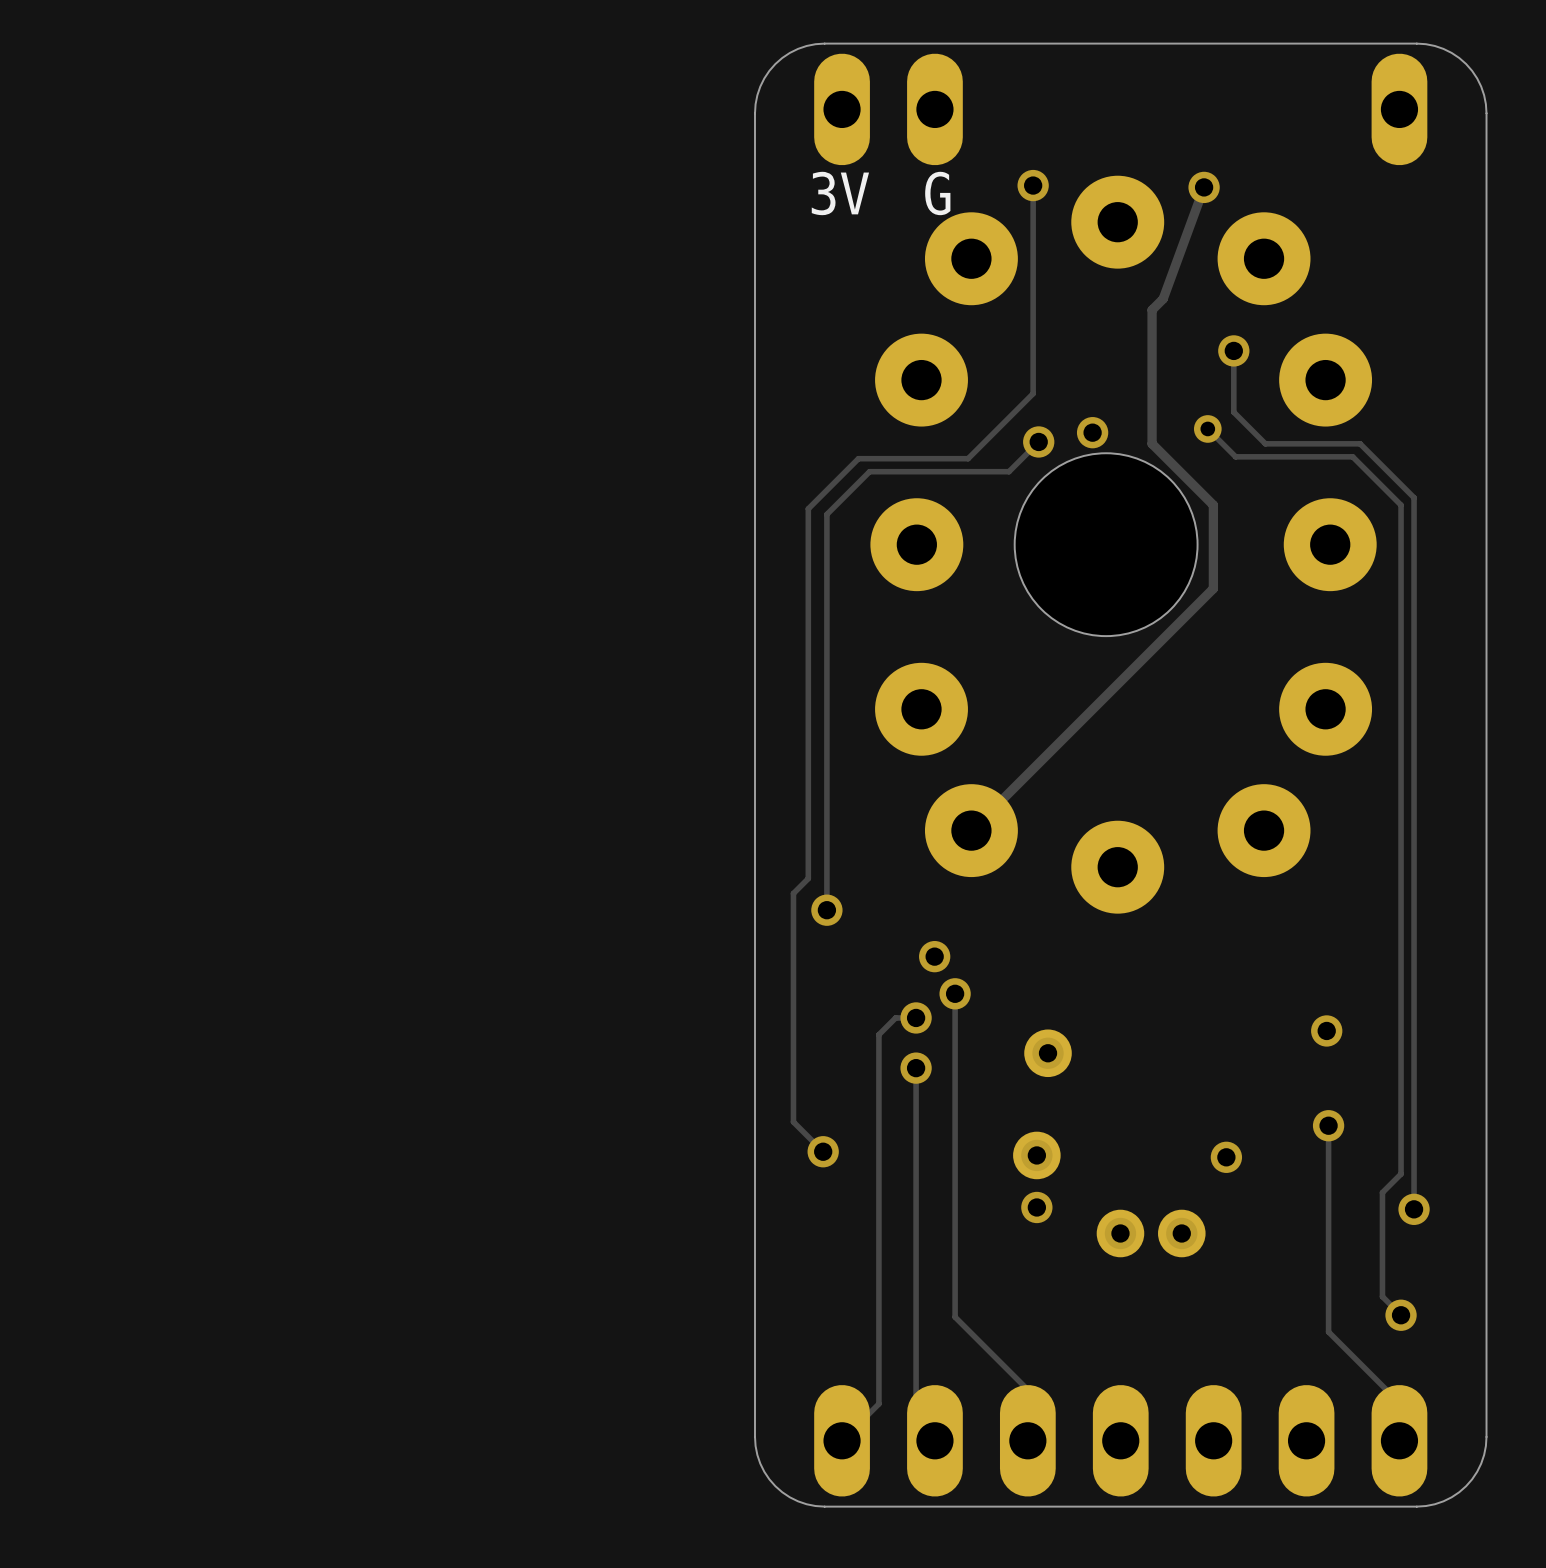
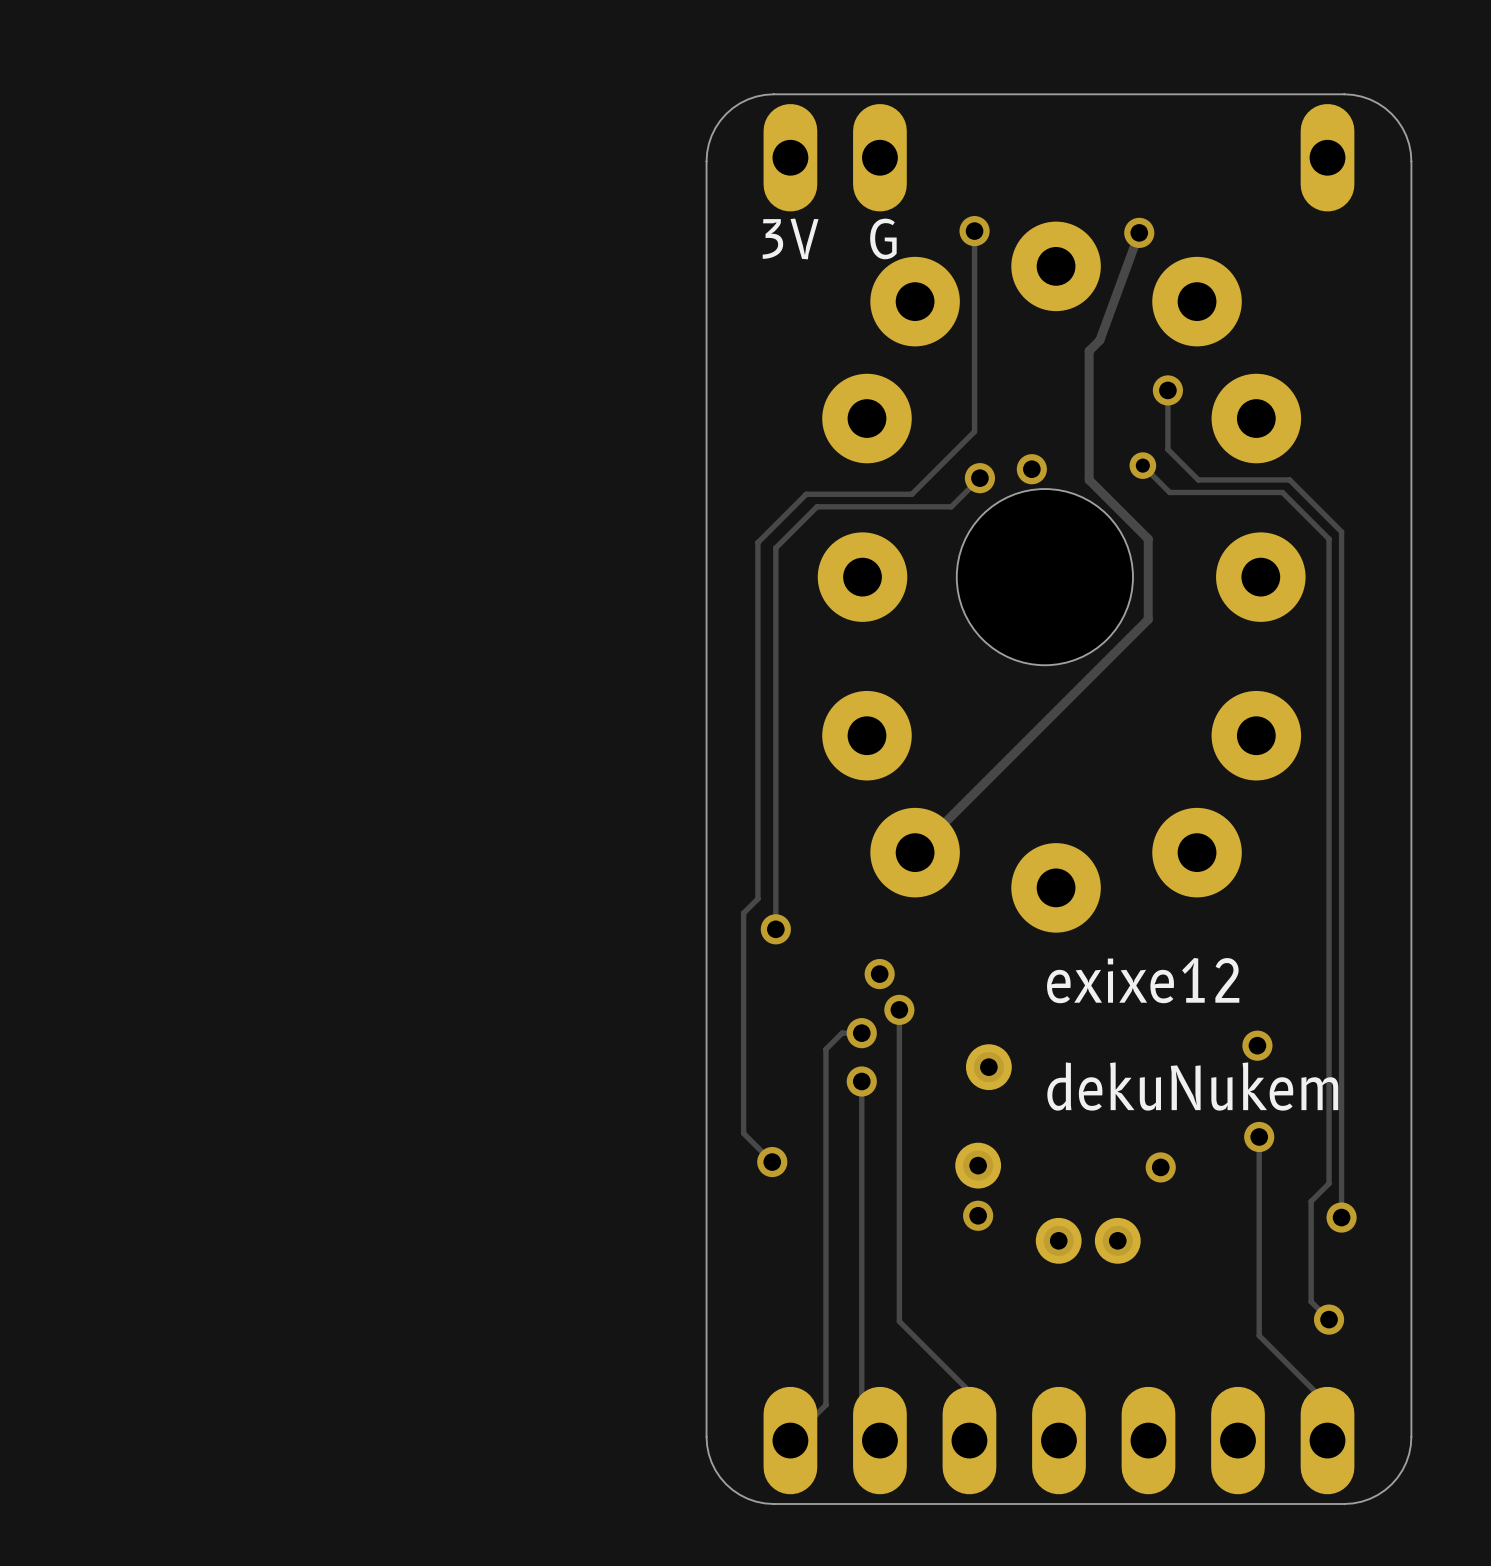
text: none -> exixe12 (1143, 980)
text: none -> dekuNukem (1192, 1086)

